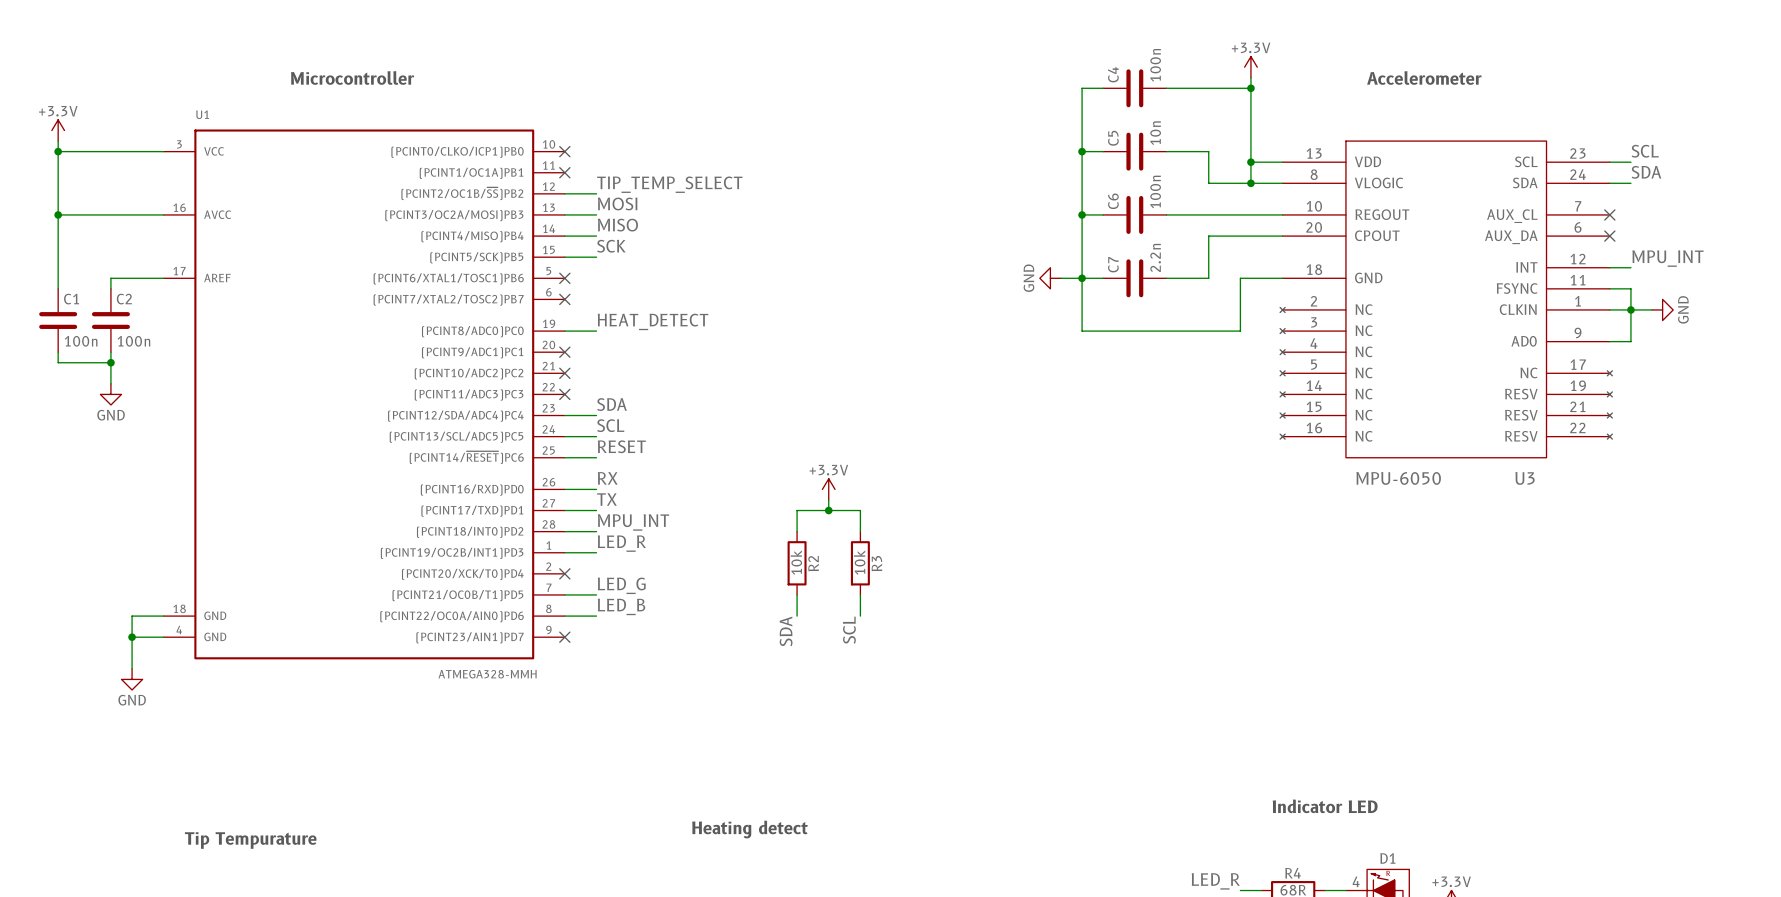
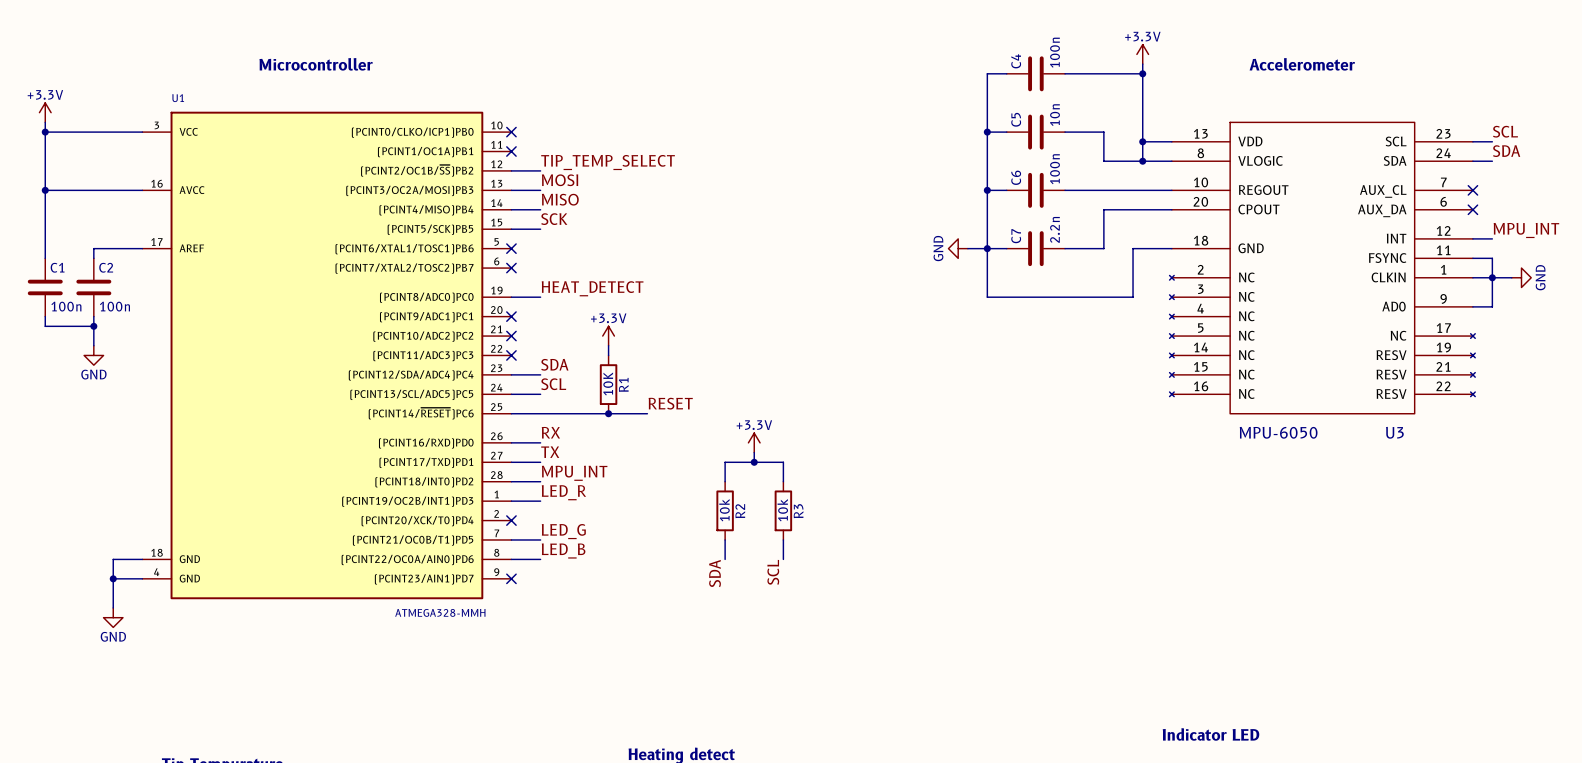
power symbol: none -> +3.3V (608, 336)
wire: none -> (608, 345) (608, 355)
R1: none -> 10K (608, 384)
label position: RESET (621, 446) -> RESET (670, 403)
wire: none -> (540, 413) (647, 413)
junction: none -> (608, 413)

